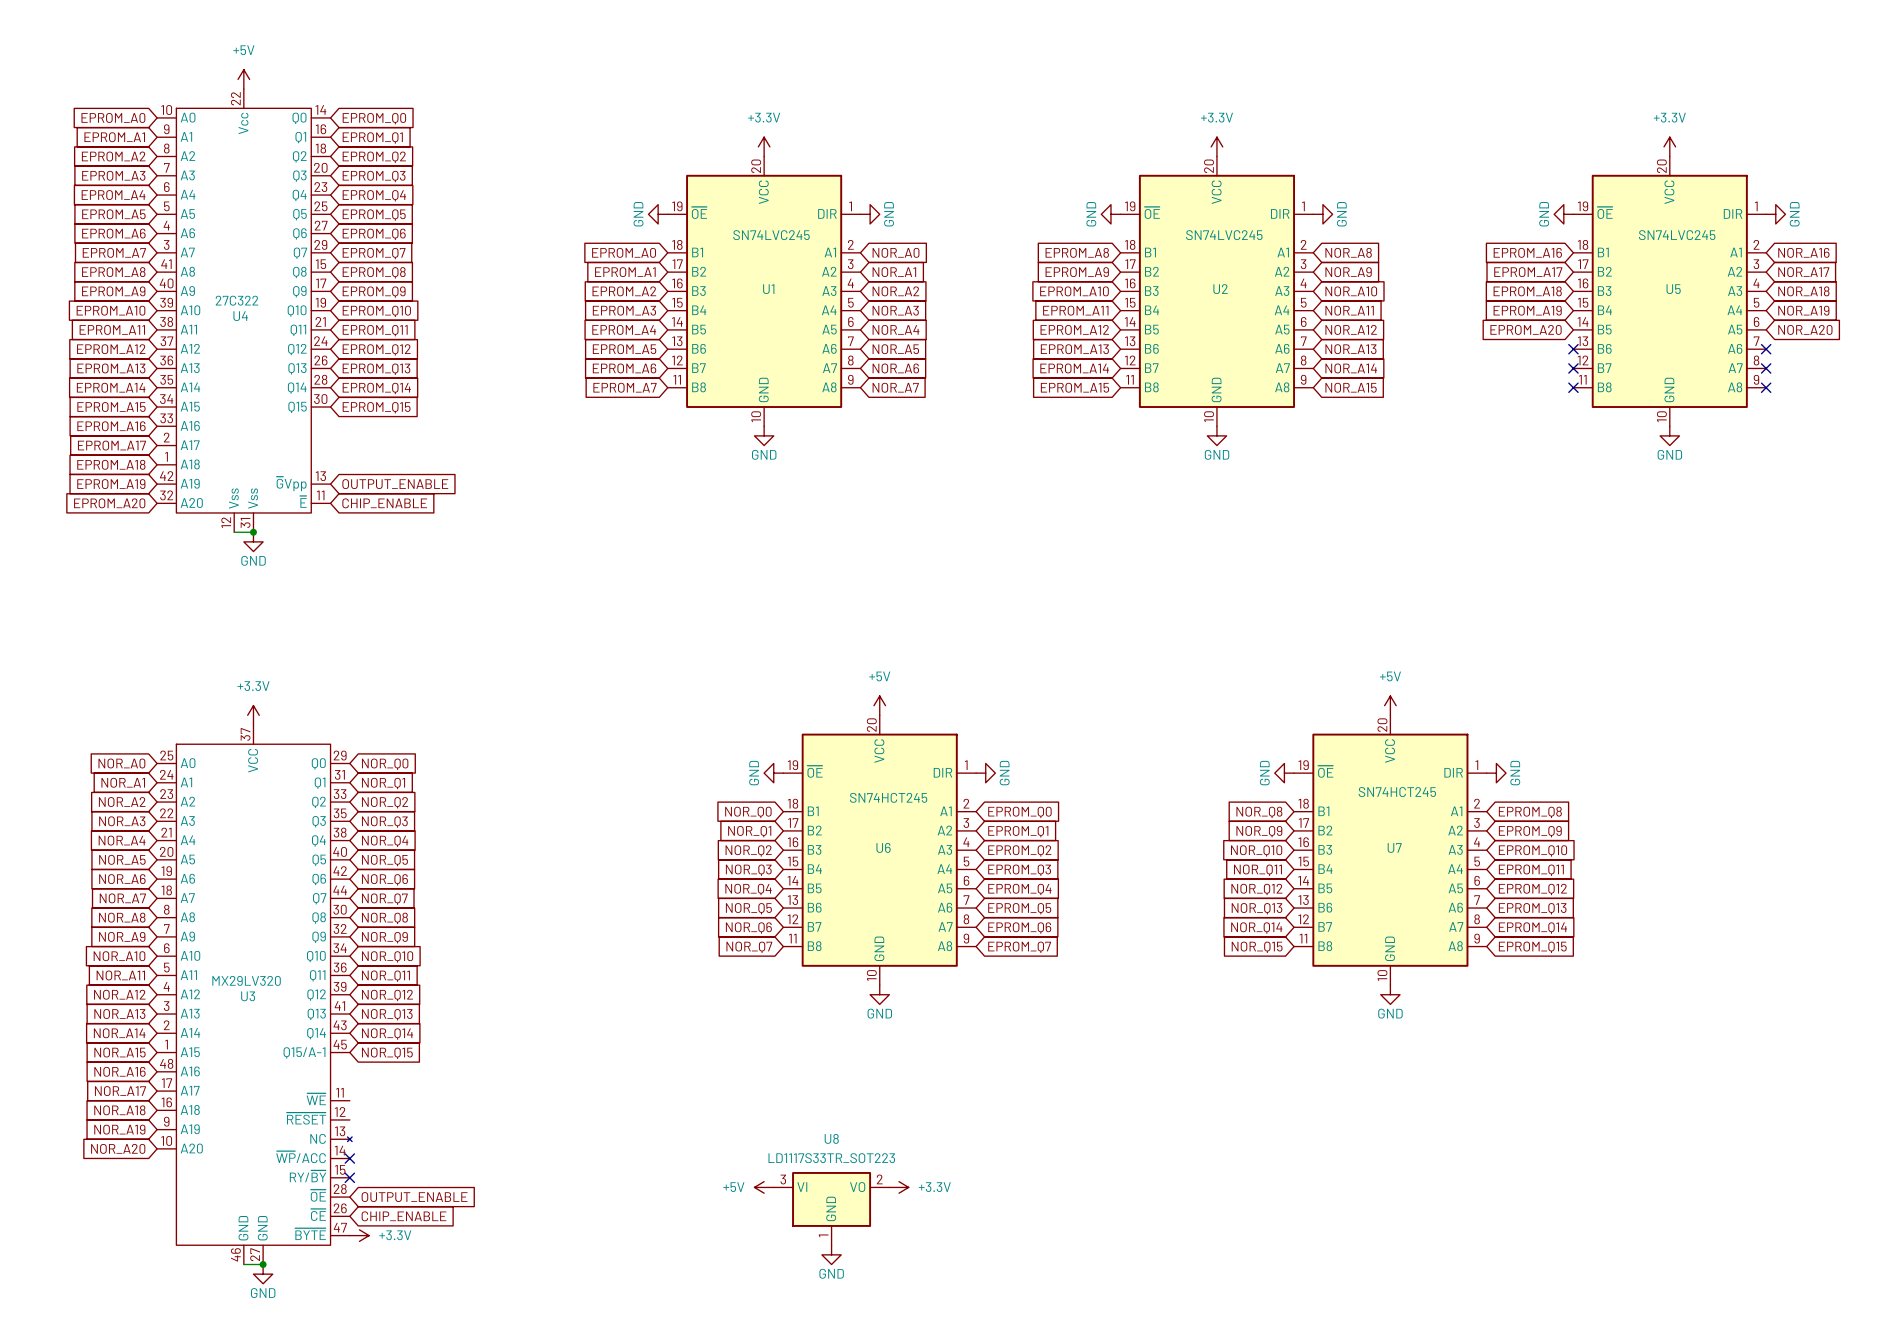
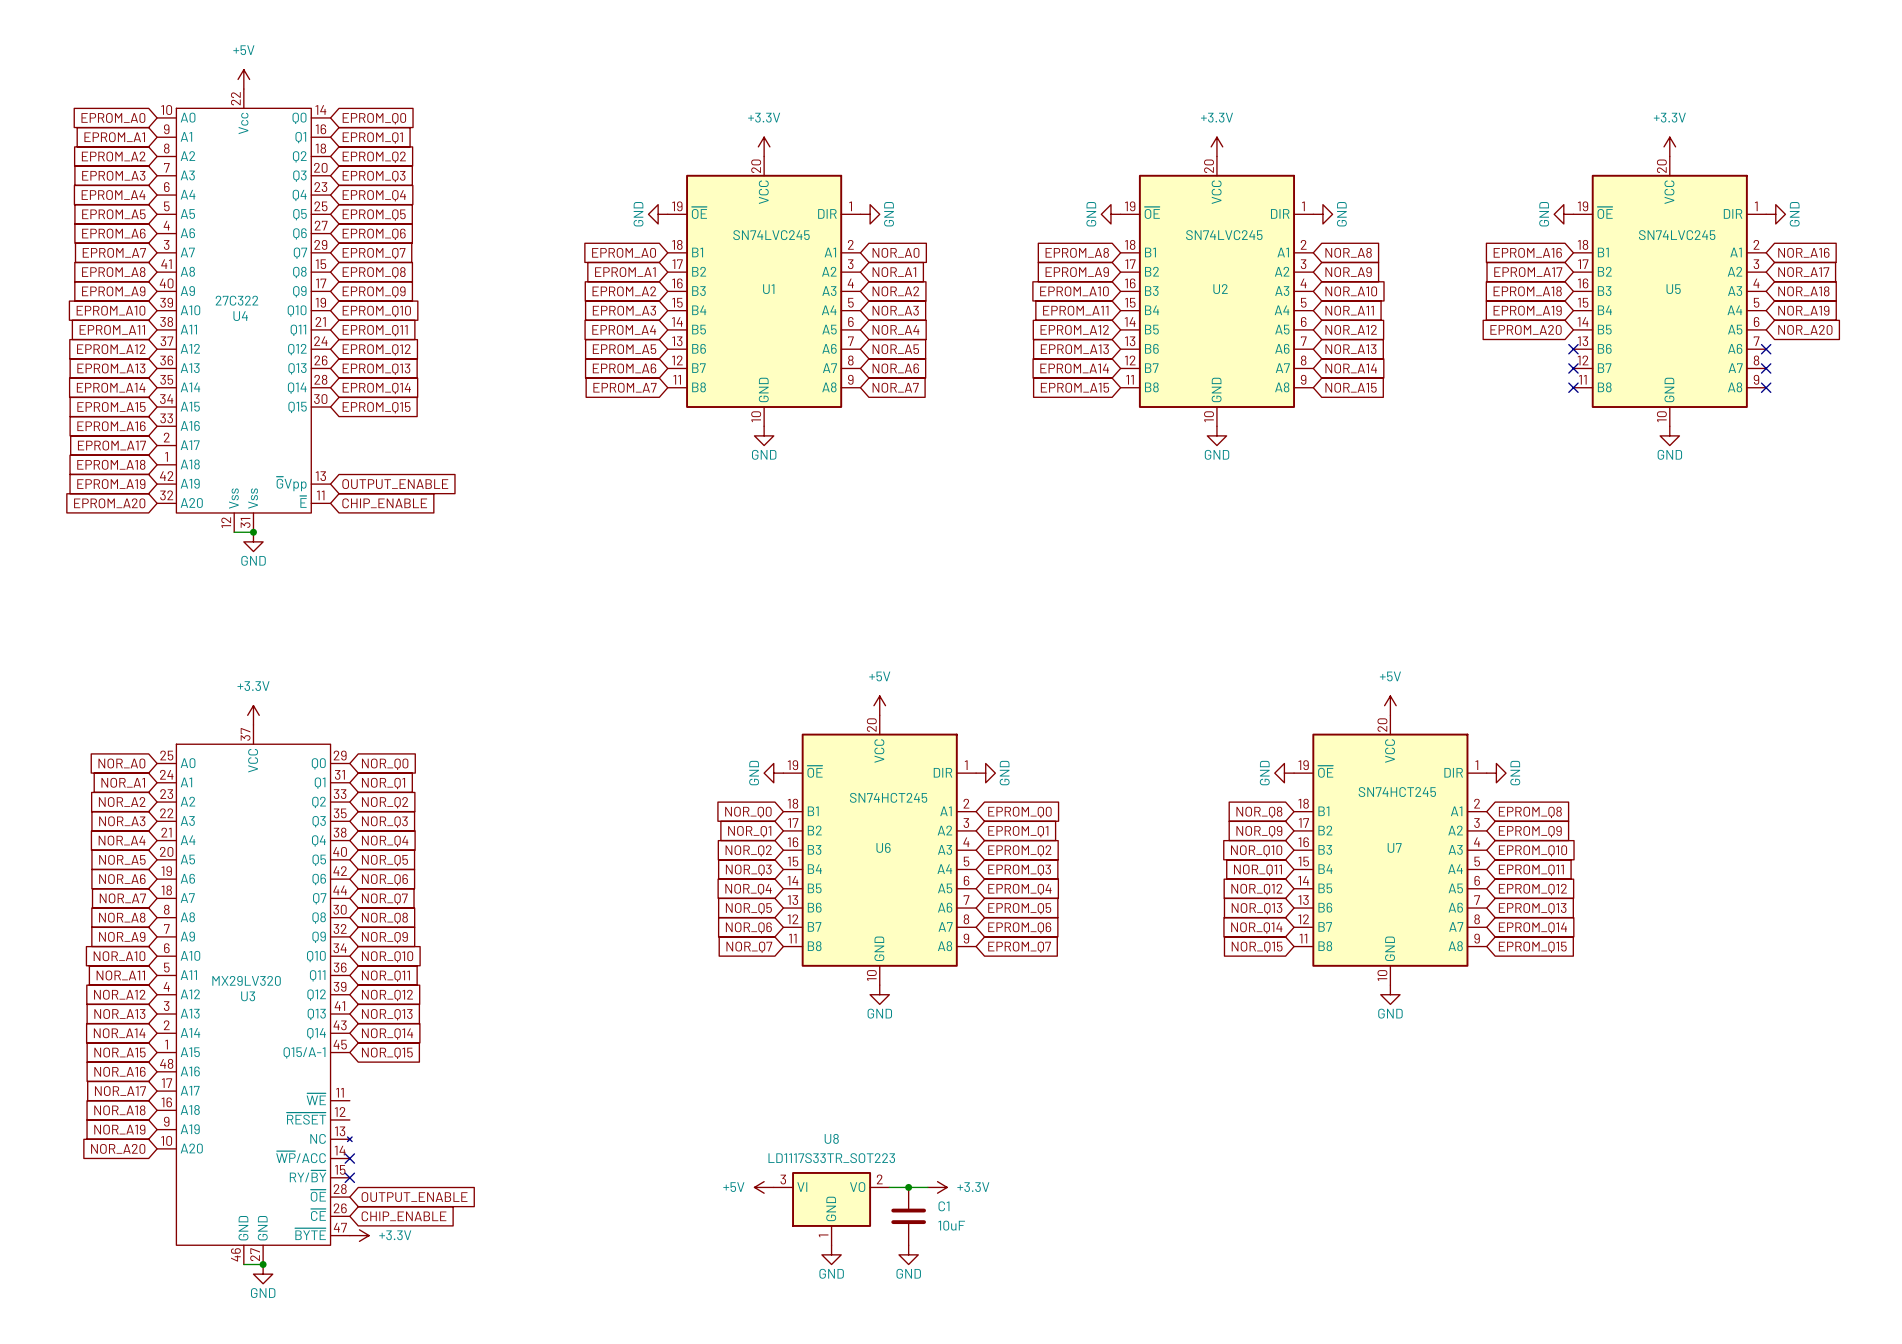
power symbol position: +3.3V (899, 1187) -> +3.3V (937, 1187)
junction: none -> (908, 1187)
C1: none -> 10uF (908, 1216)
power symbol: none -> GND (908, 1254)

